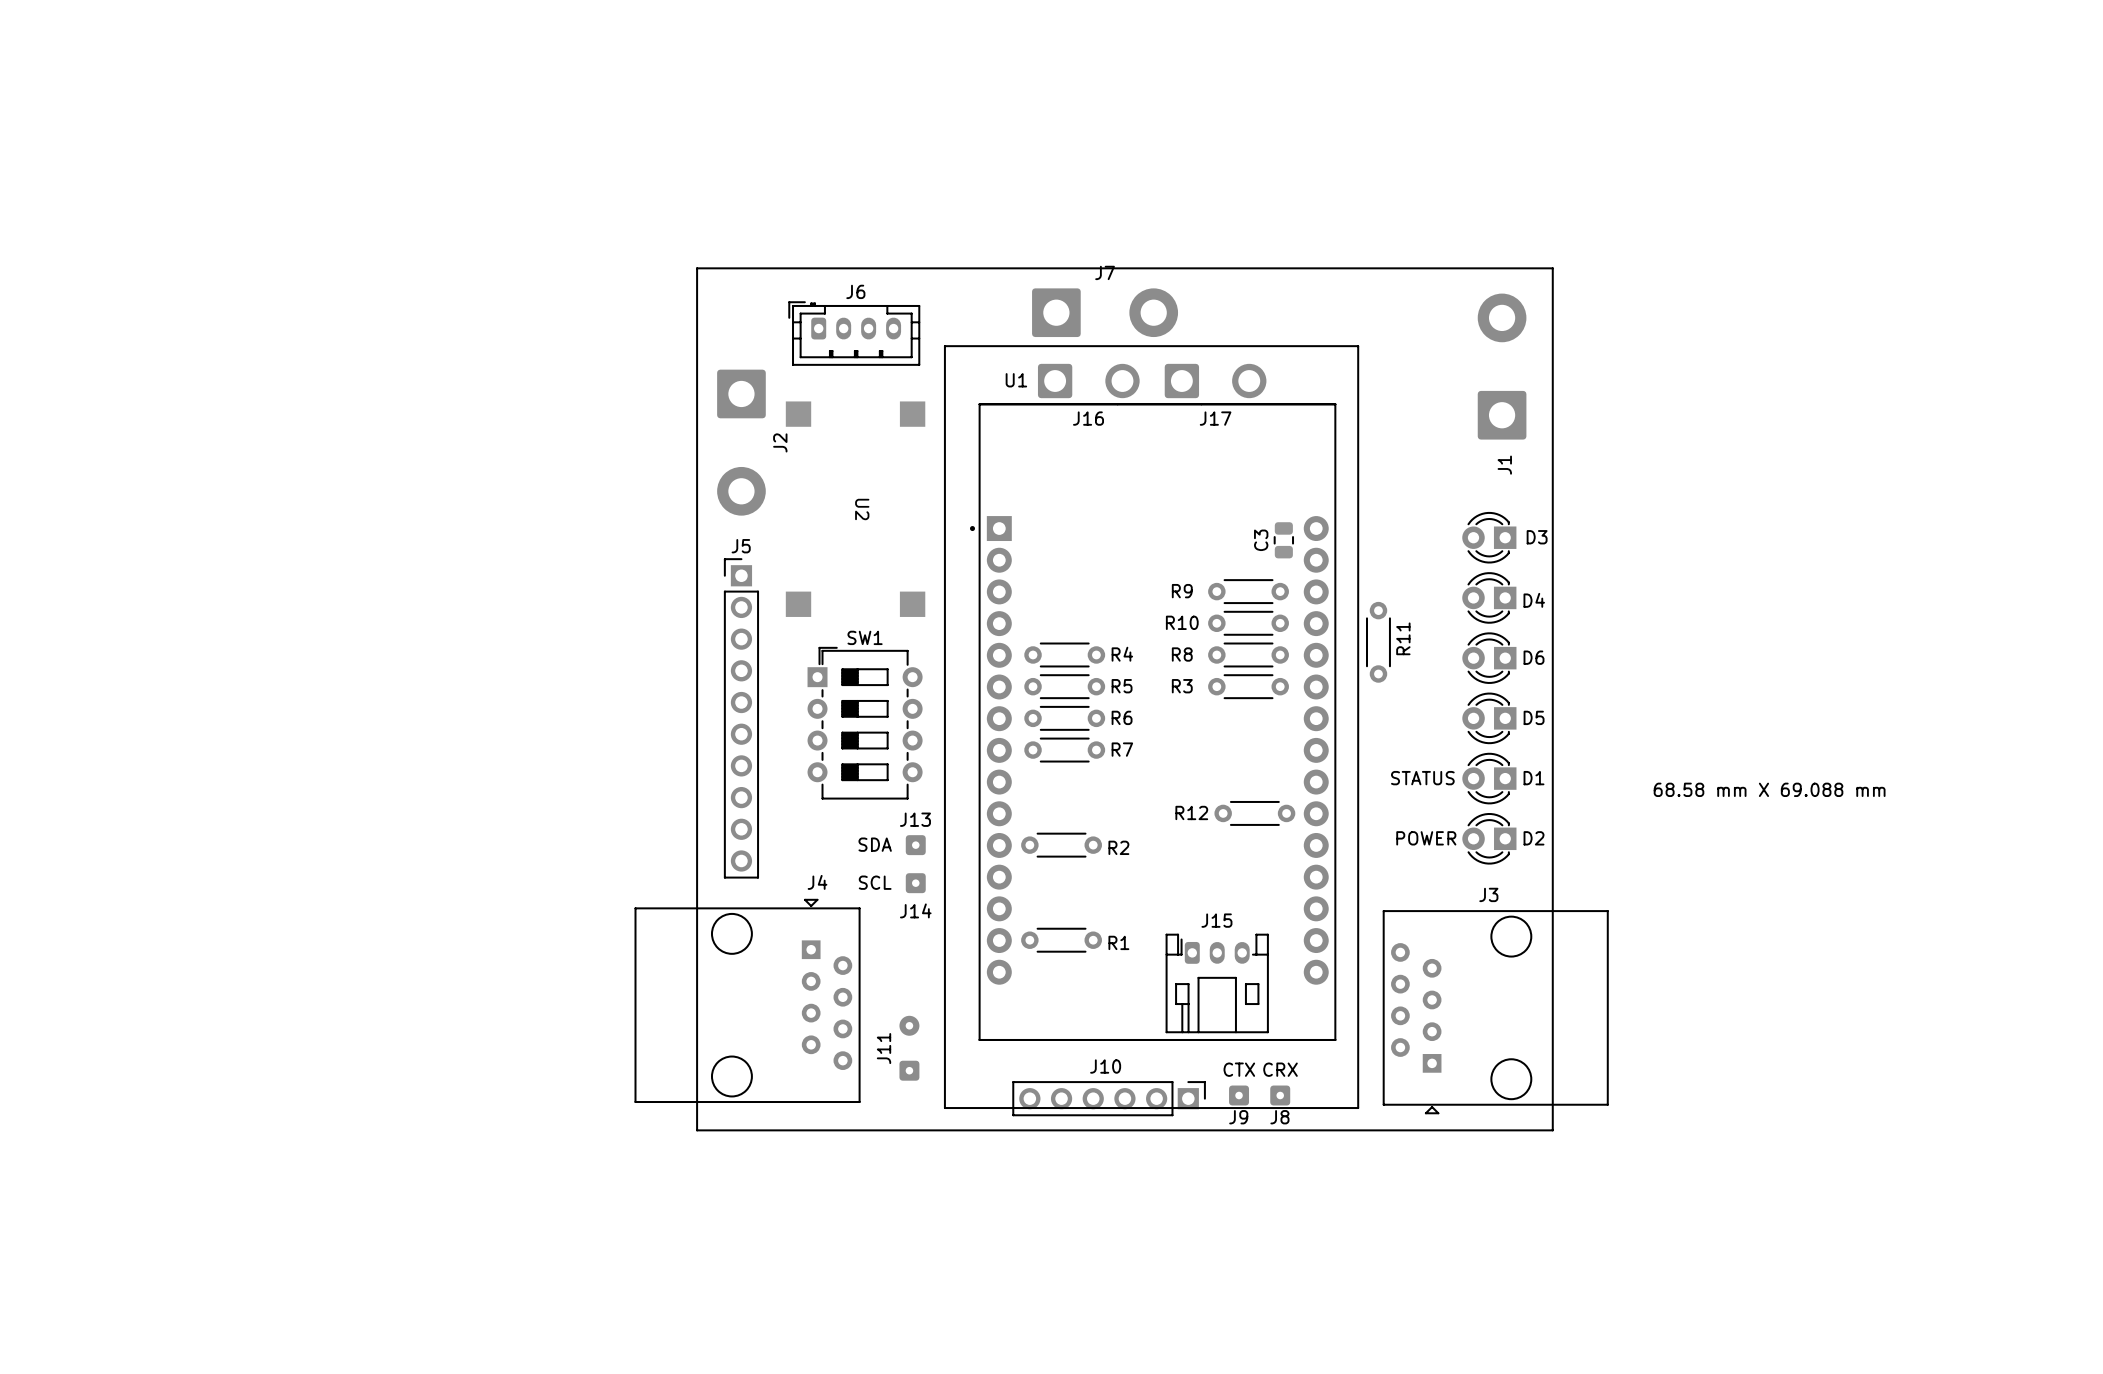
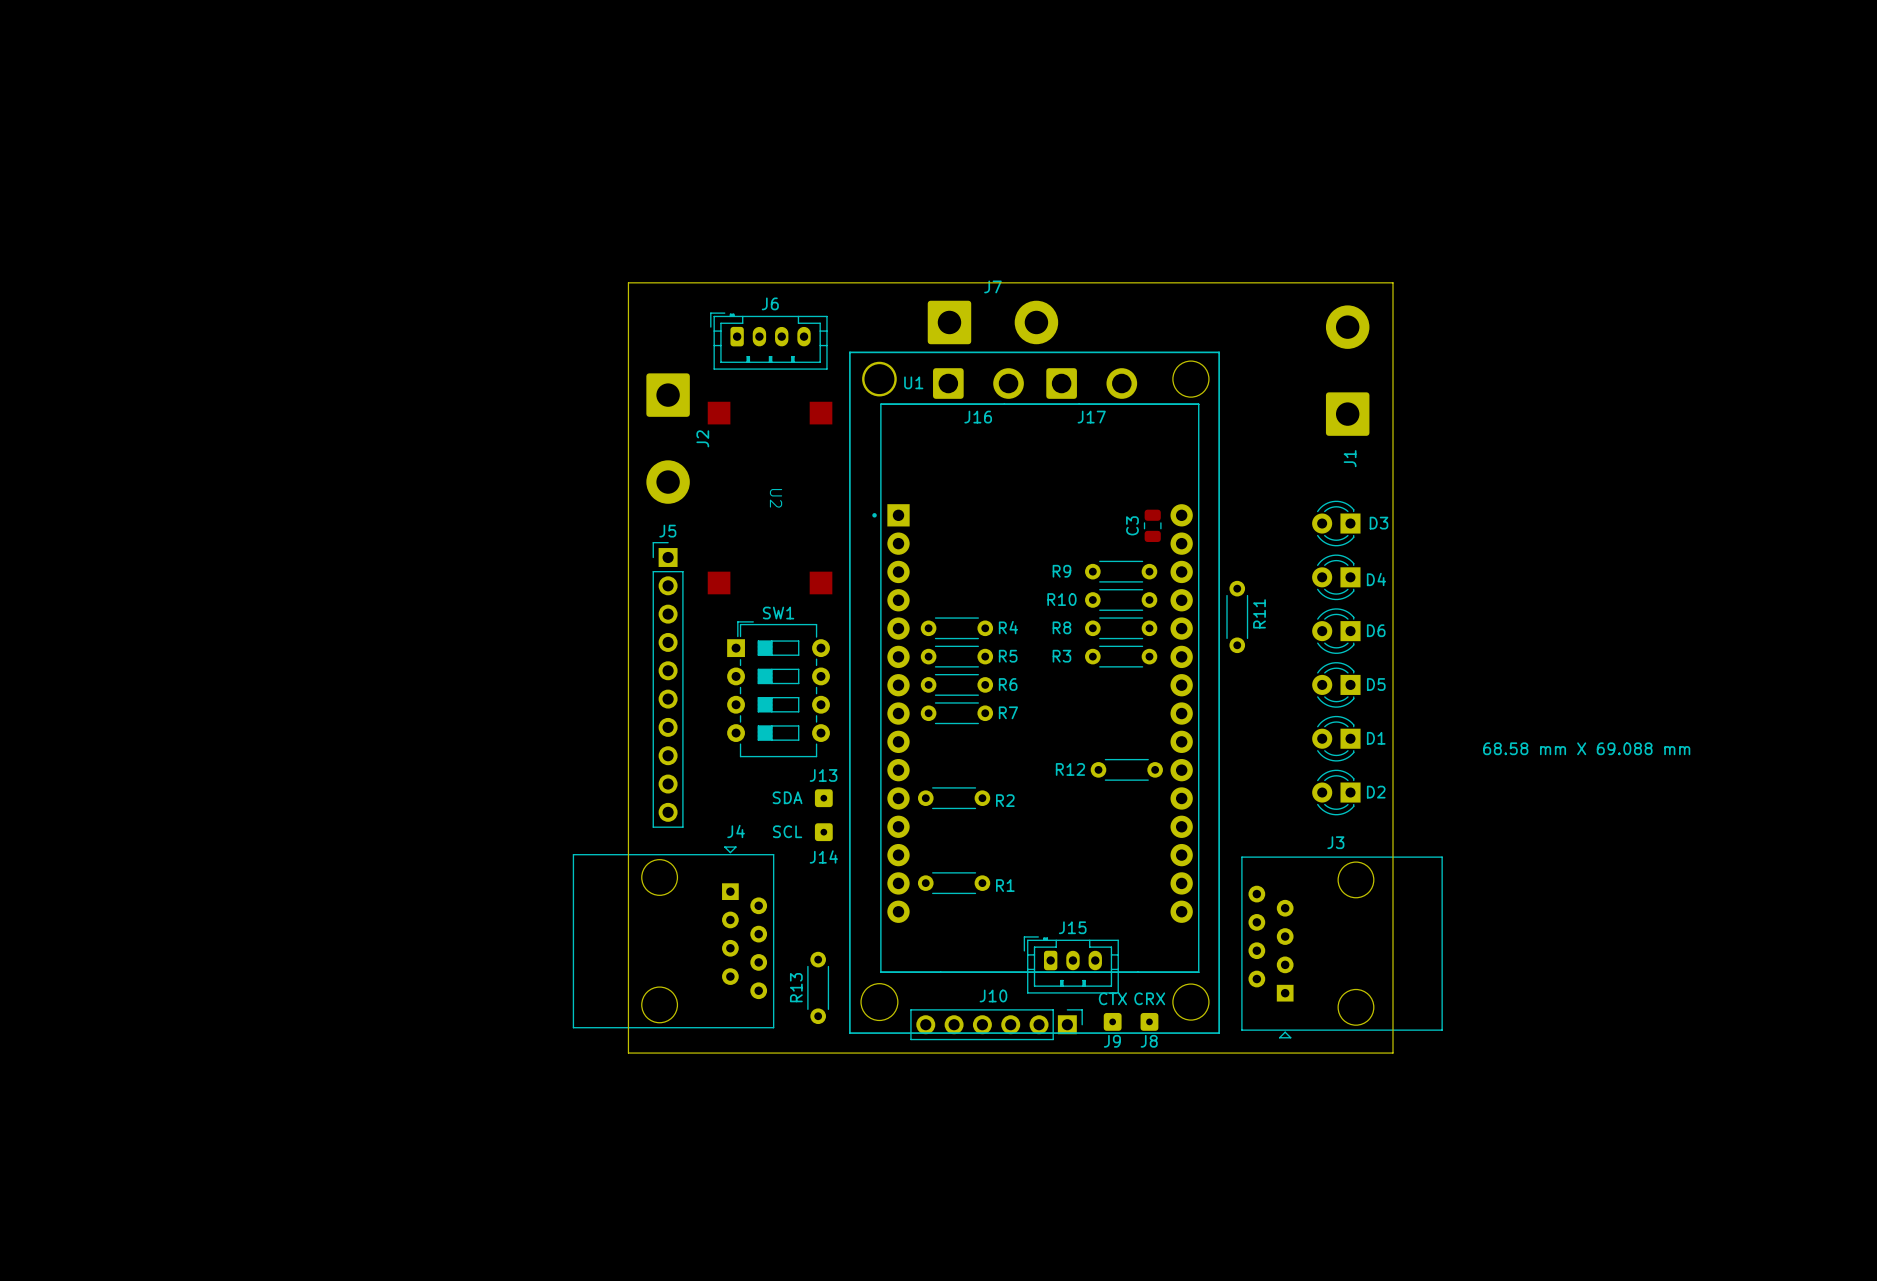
round board edge: none -> [1172, 360, 1210, 398]
round board edge: none -> [862, 361, 897, 397]
round board edge: none -> [863, 362, 896, 396]
D1 value: STATUS (1422, 778) -> none
D2 value: POWER (1426, 838) -> none
J15 footprint: [1165, 933, 1269, 1033] -> [1023, 936, 1119, 994]
J11: (909, 1048) -> none
round board edge: none -> [860, 983, 899, 1022]
round board edge: none -> [1172, 983, 1210, 1021]
R13: none -> (818, 987)

